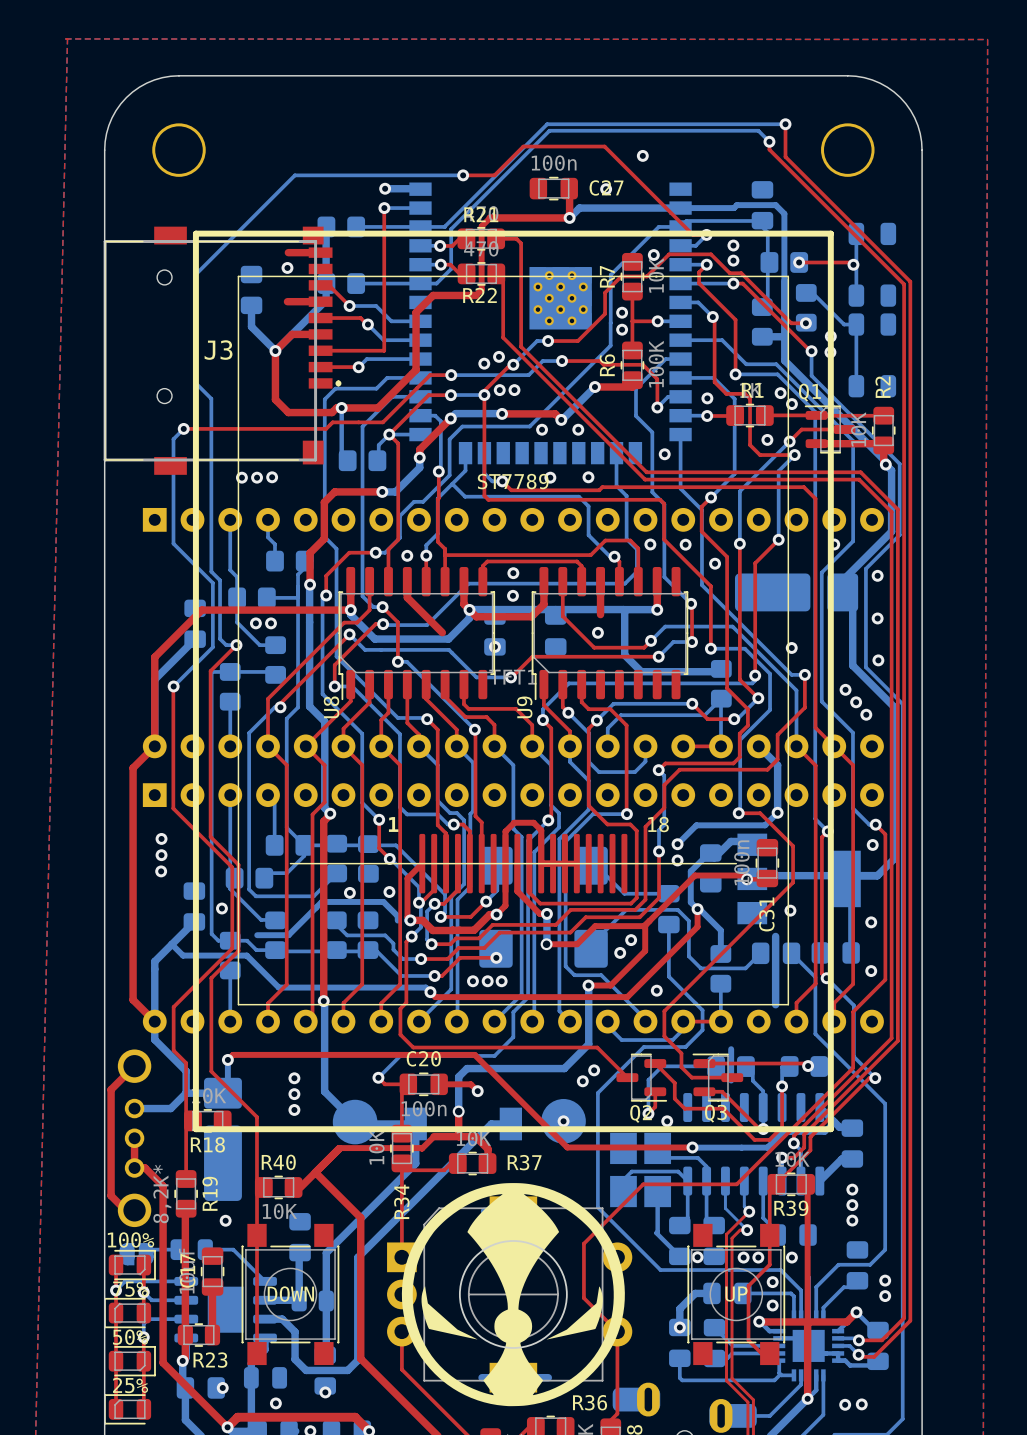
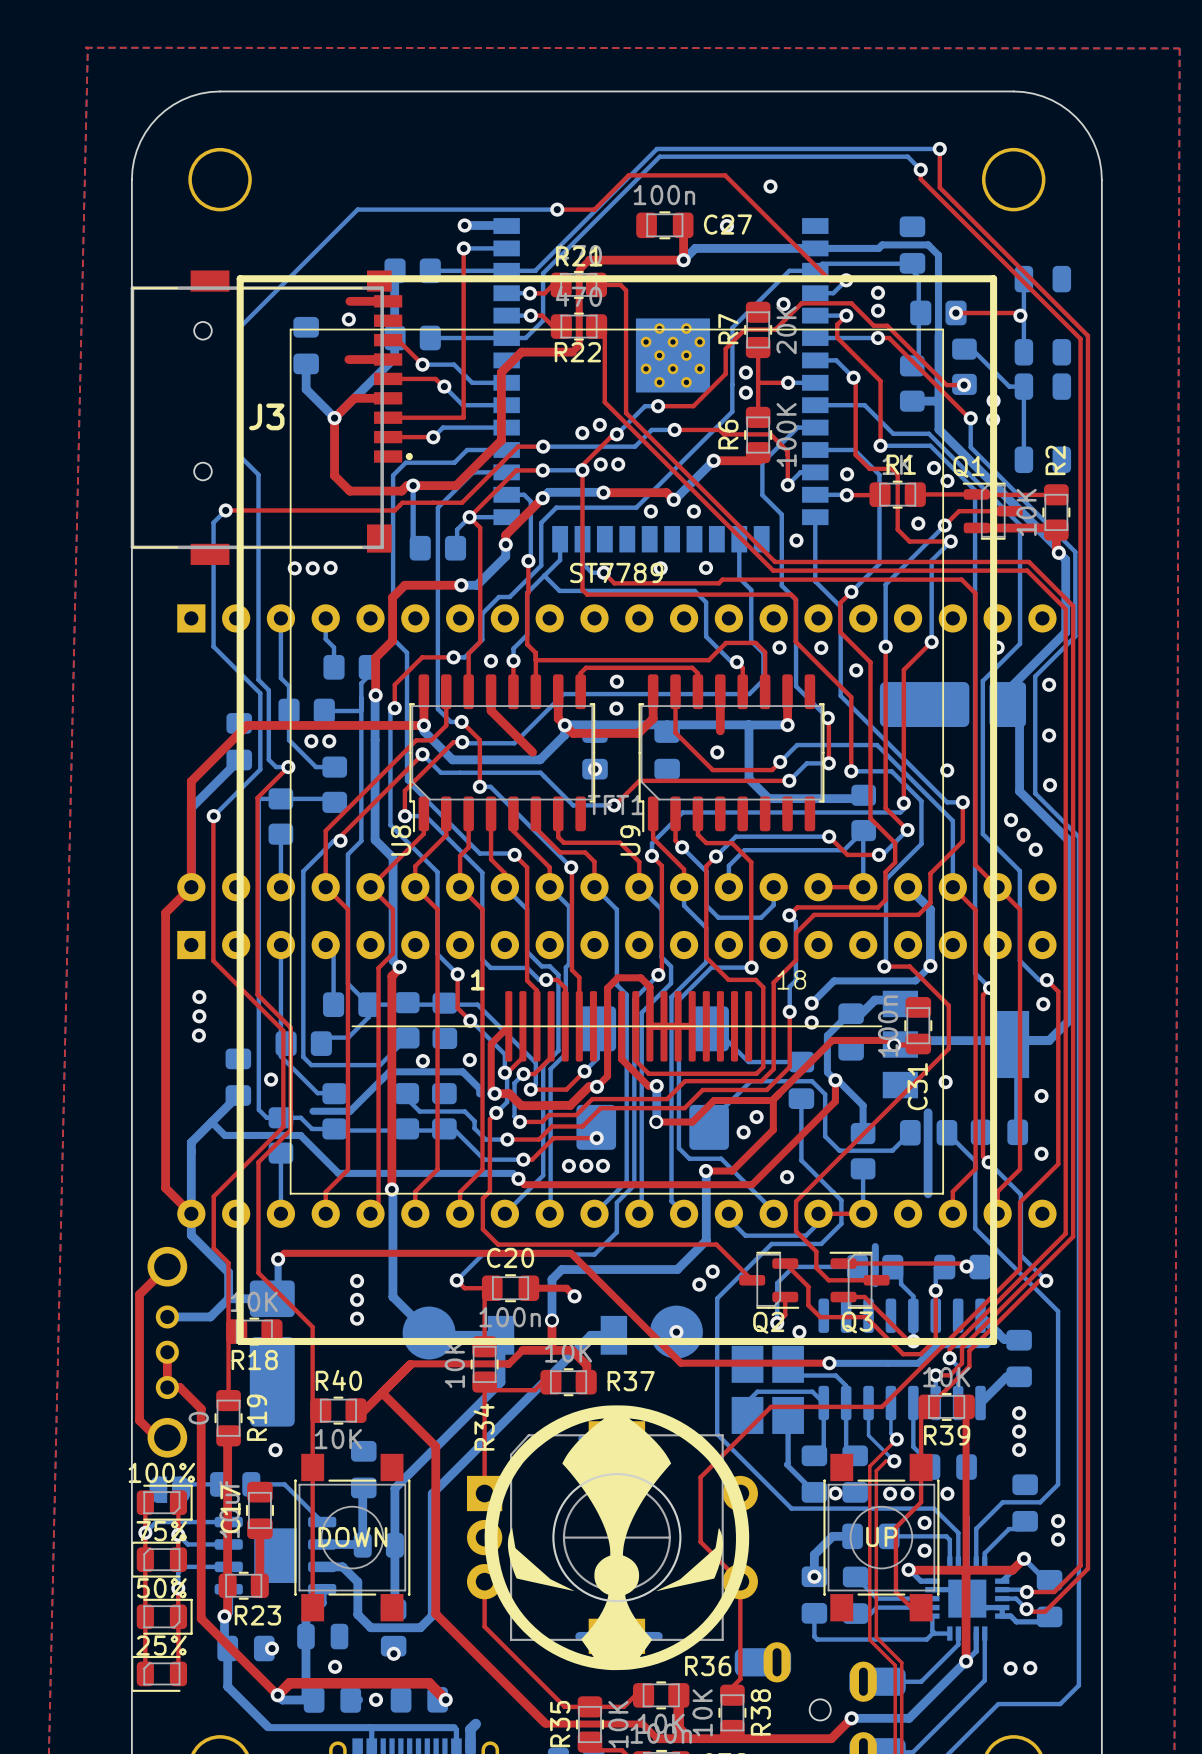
R7 value: 10K (656, 275) -> 20K (786, 330)
R19 value: 8,2К* (162, 1194) -> 0 (198, 1418)

